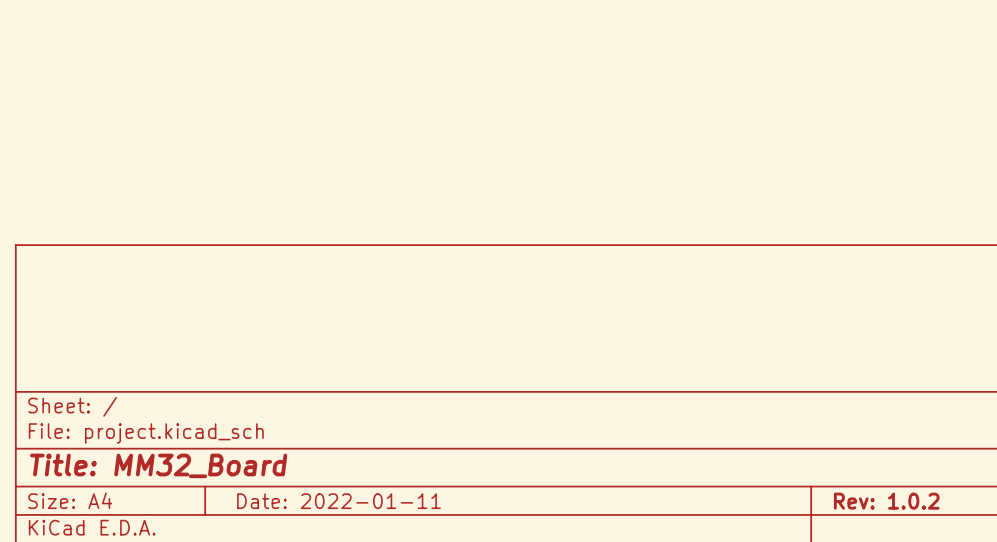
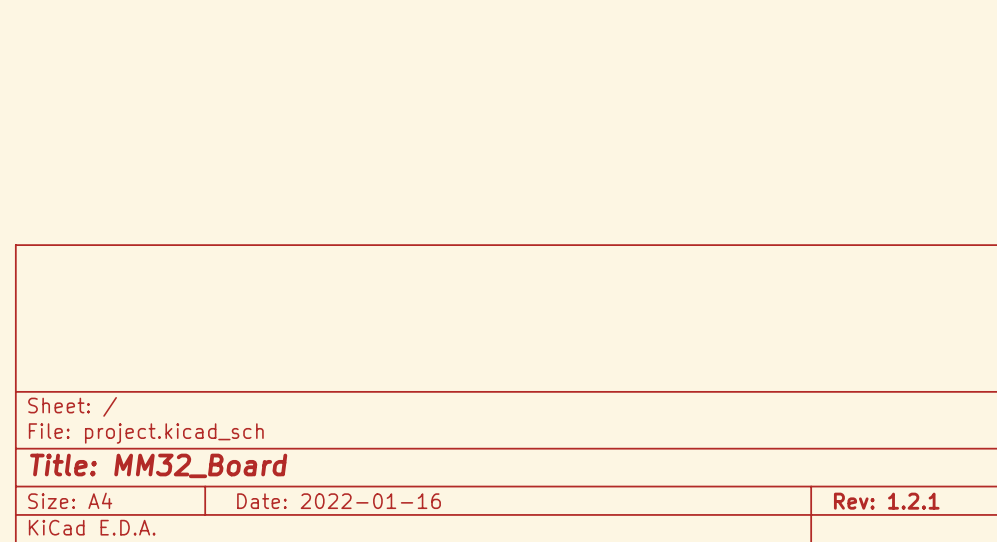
title block: Date: 2022-01-11 (339, 501) -> Date: 2022-01-16 (339, 501)
title block: Rev: 1.0.2 (886, 501) -> Rev: 1.2.1 (886, 501)

